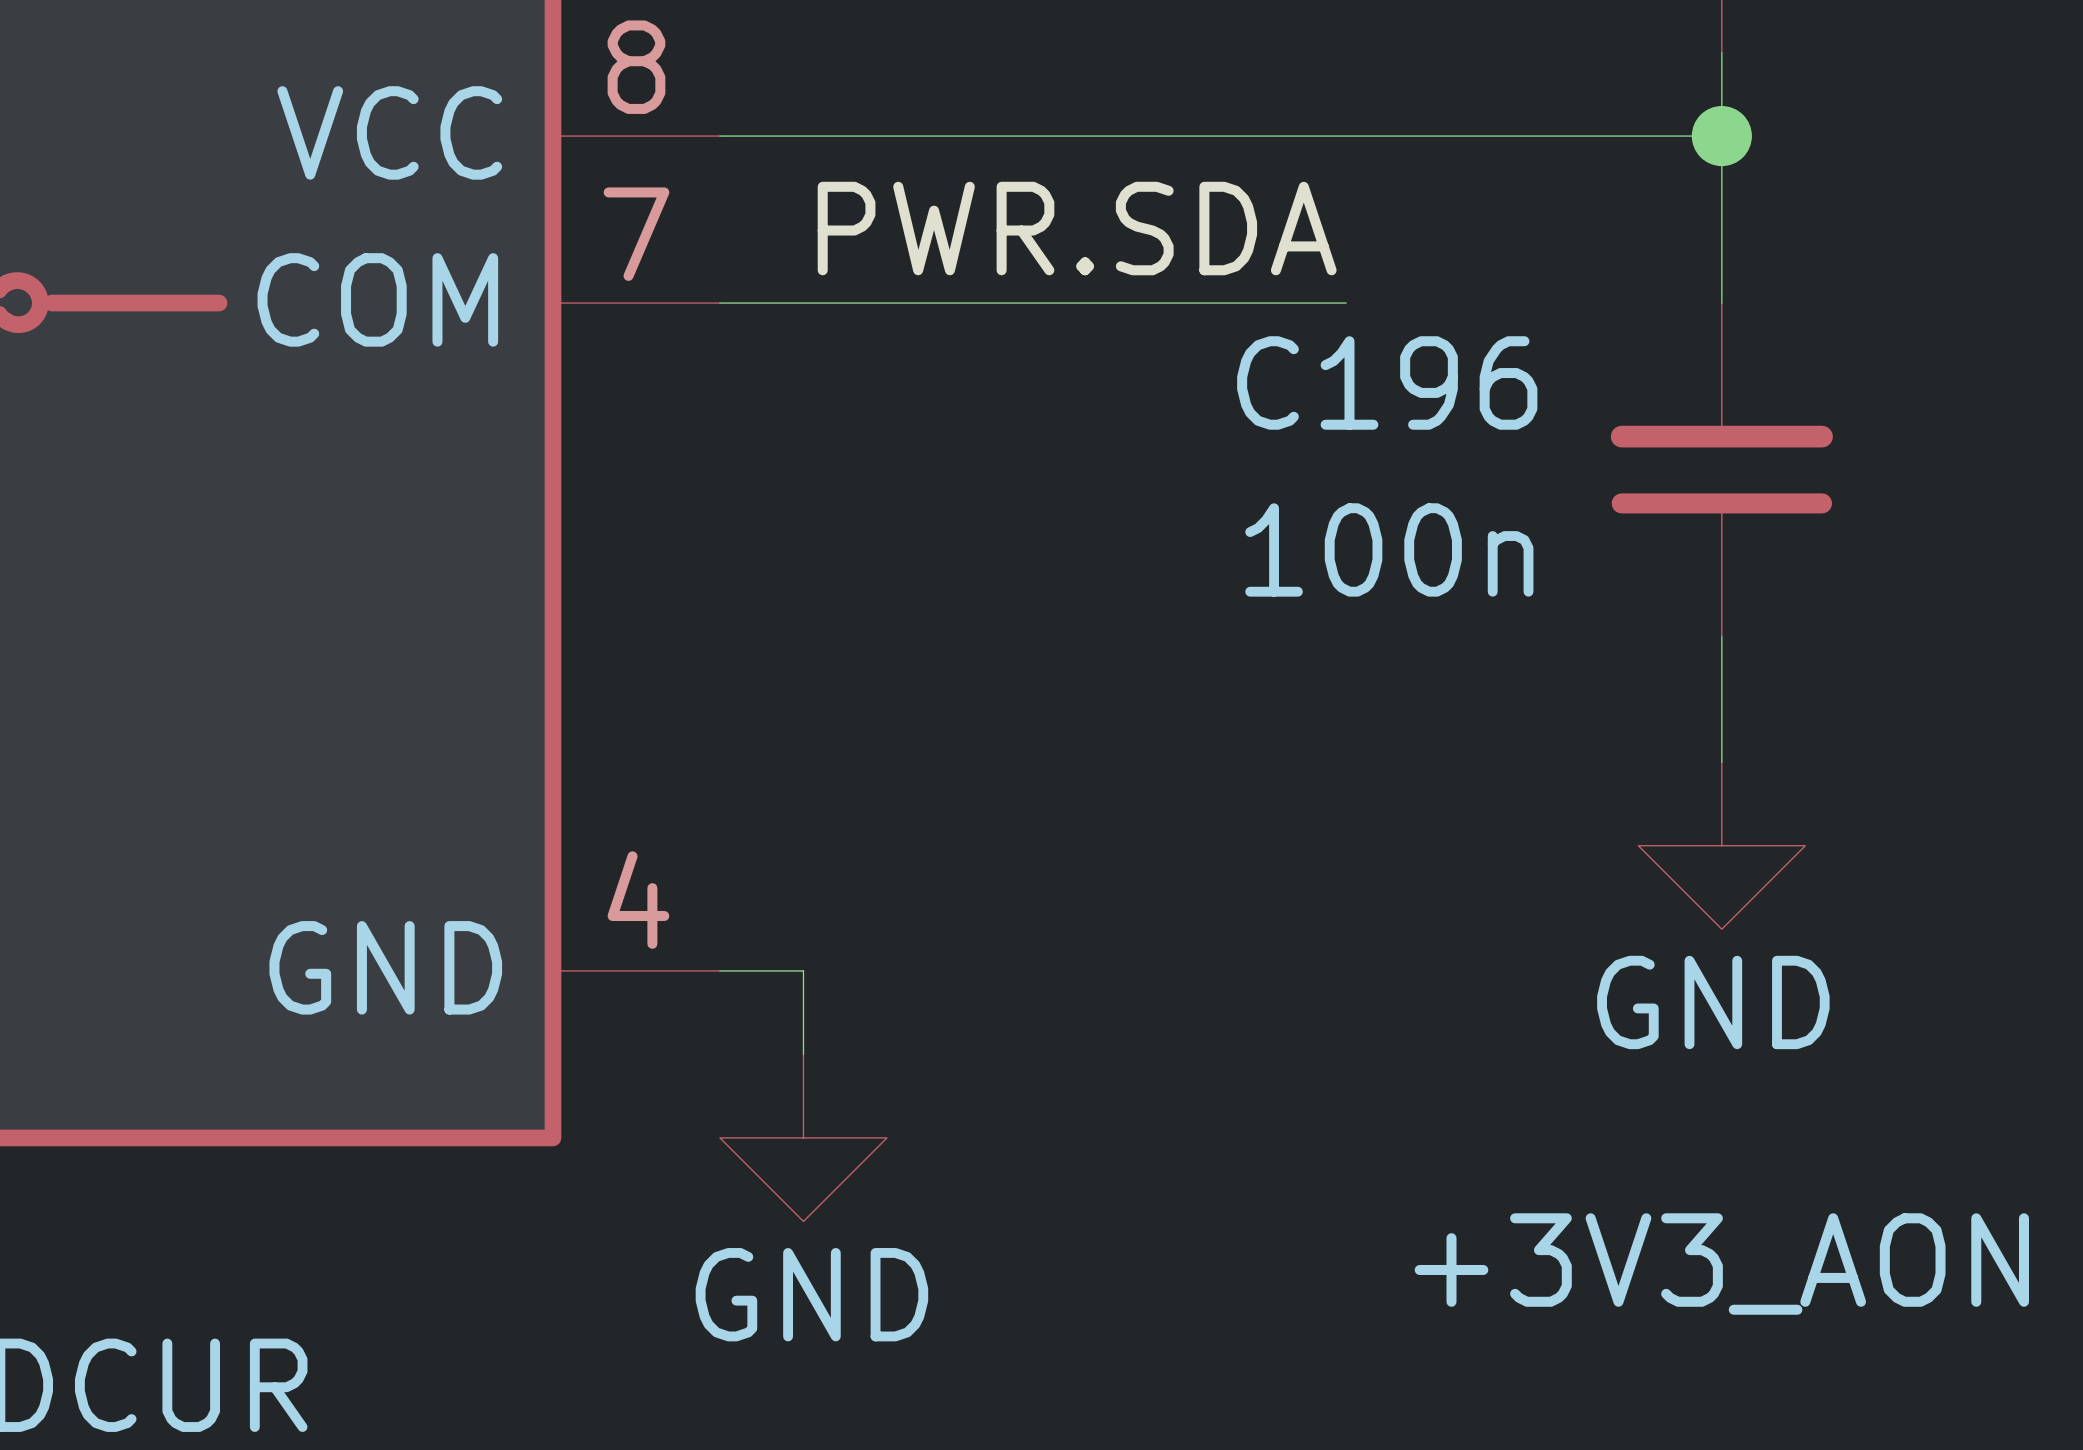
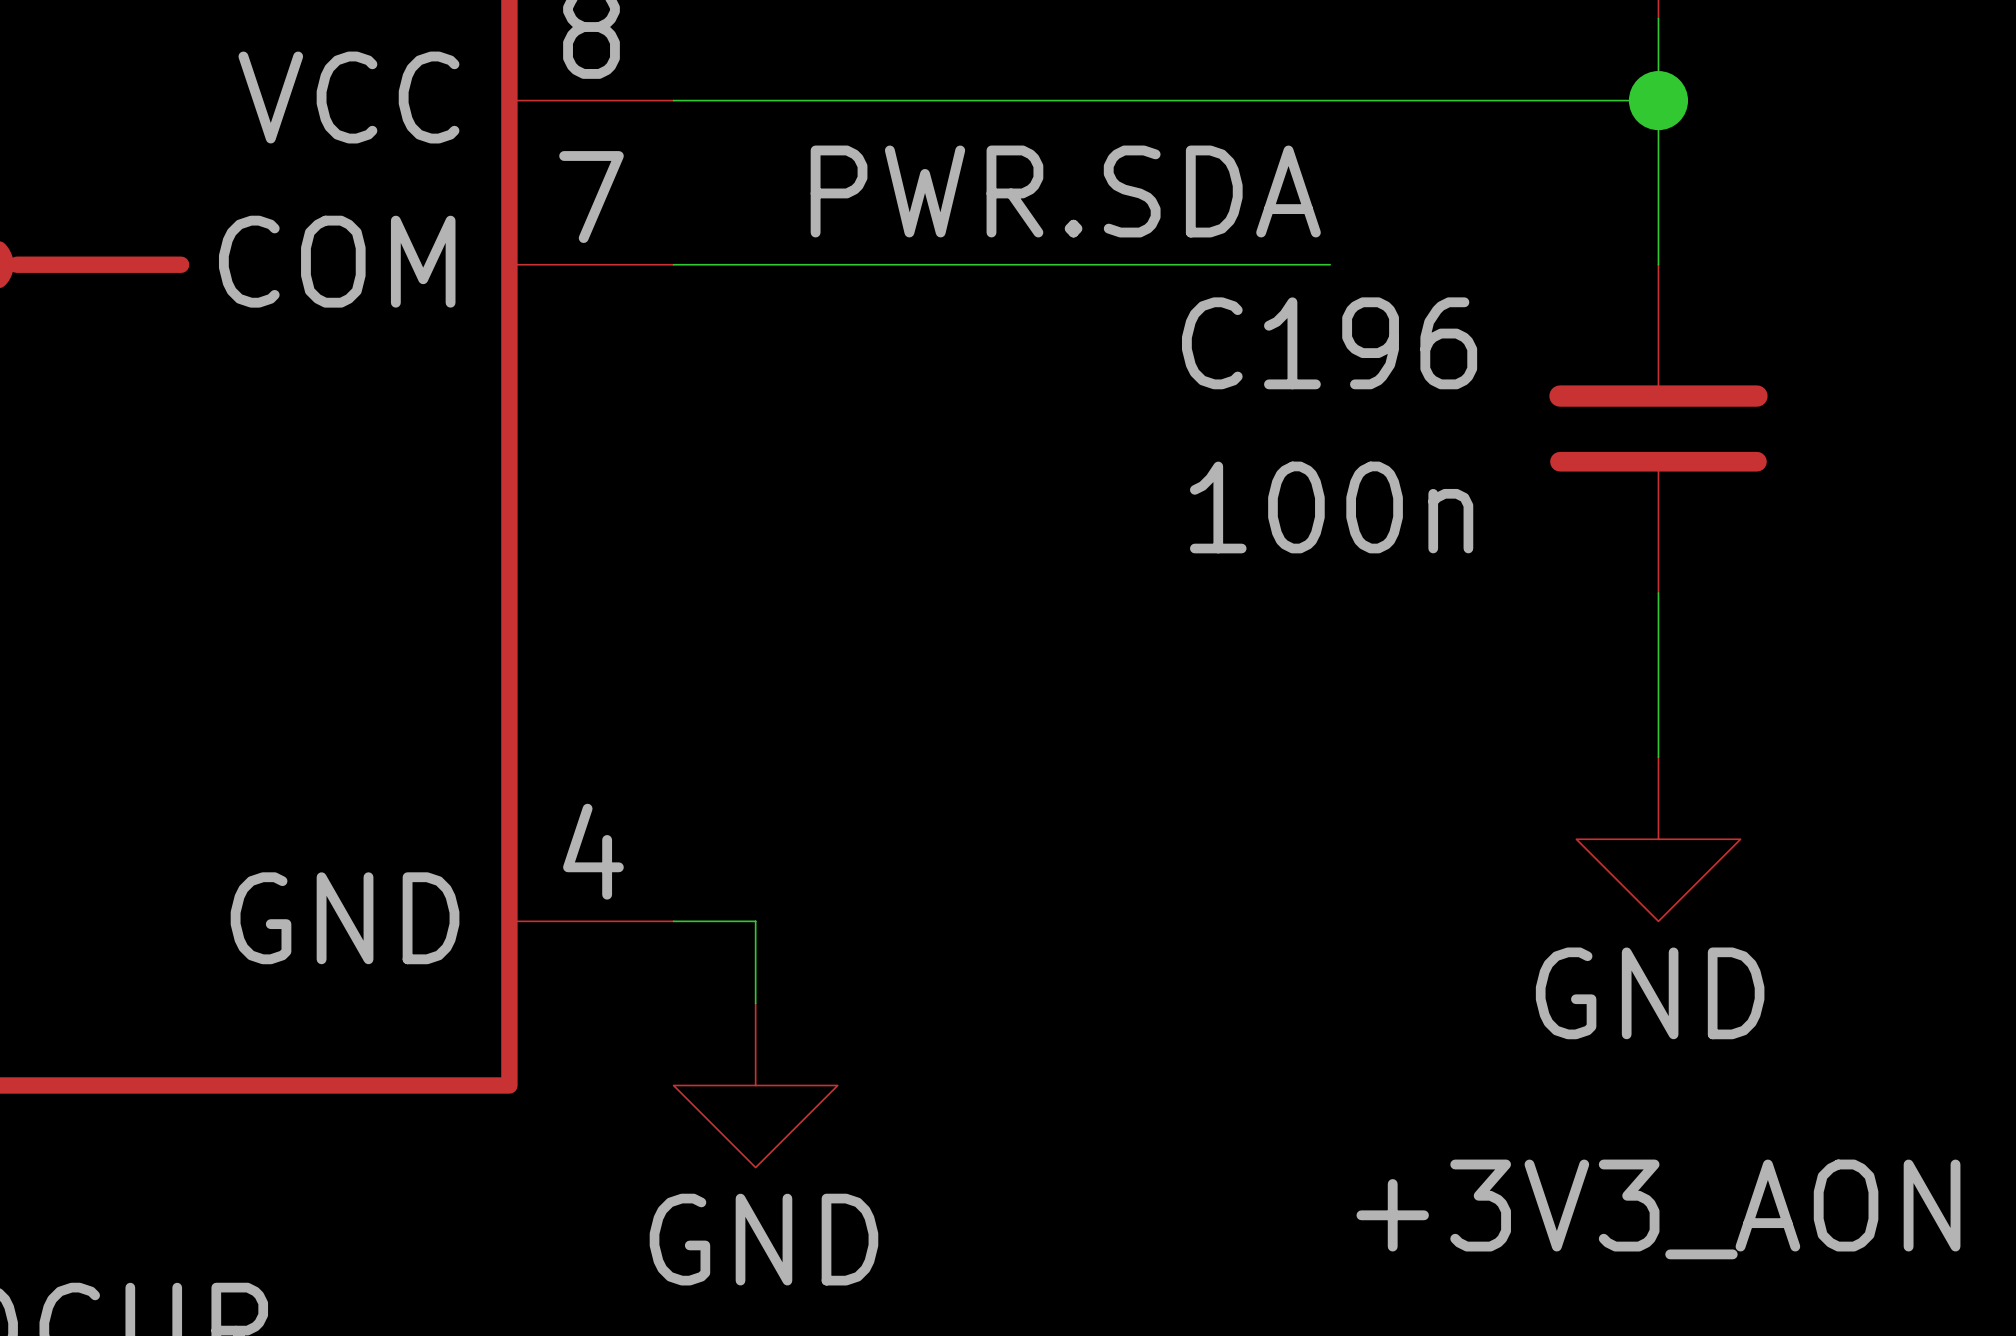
label position: PWR.SDA (1077, 228) -> PWR.SDA (1065, 191)
wire: none -> (1289, 264) (1330, 264)
power symbol position: GND (1721, 845) -> GND (1658, 839)

